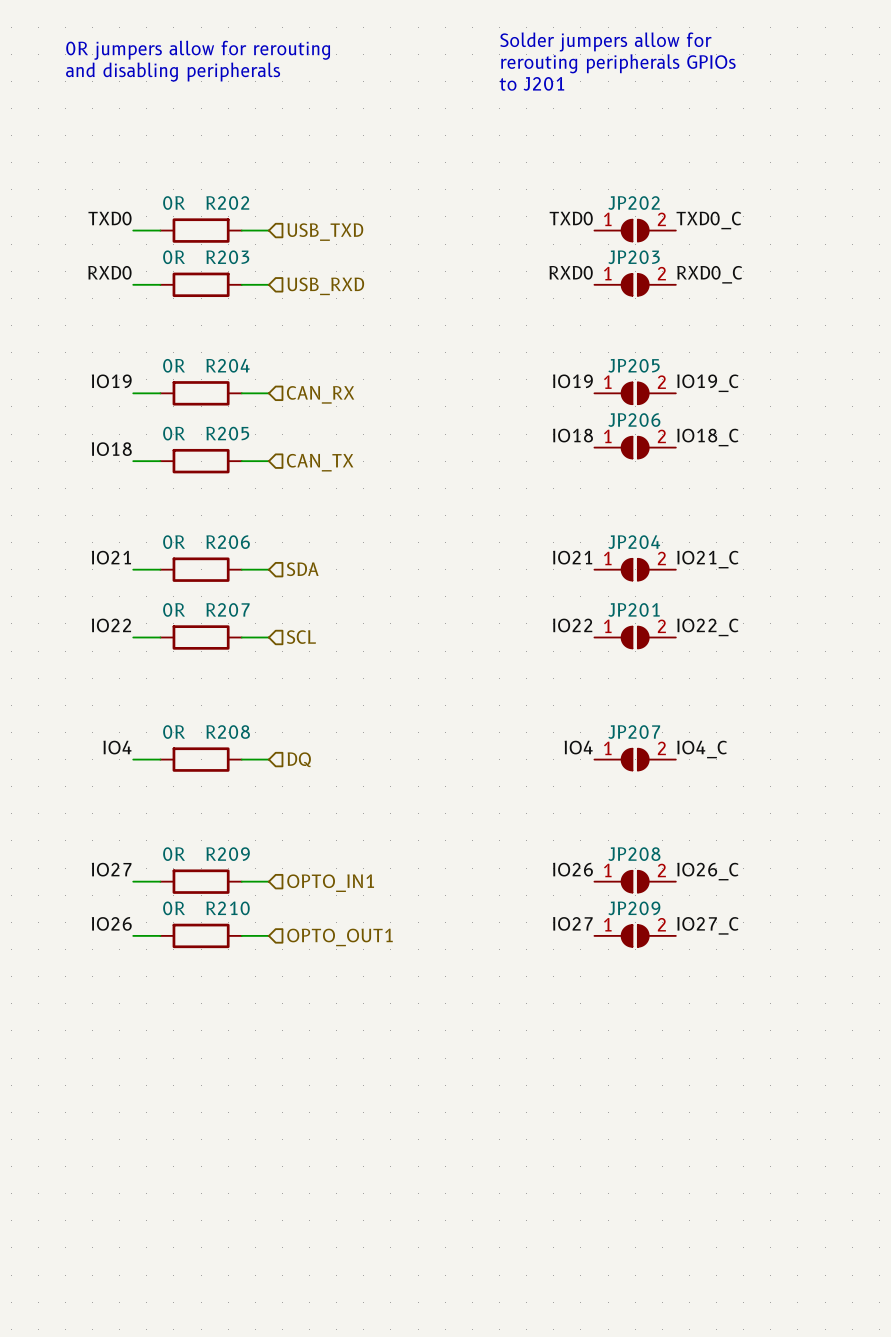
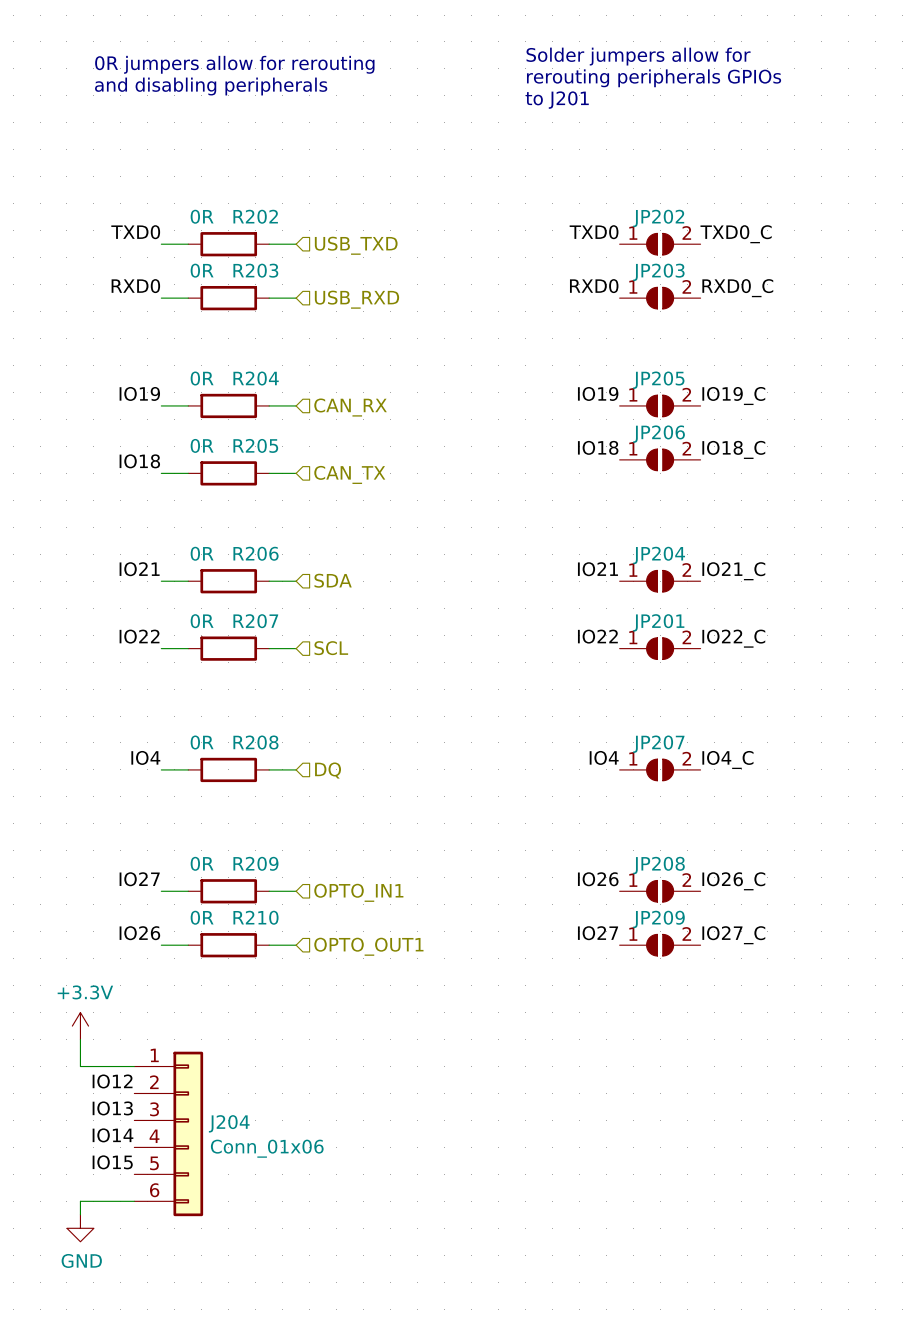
power symbol: none -> +3.3V (80, 1026)
wire: none -> (80, 1039) (80, 1066) (134, 1066)
label: none -> IO12 (112, 1081)
label: none -> IO13 (112, 1108)
J204: none -> Conn_01x06 (168, 1133)
label: none -> IO14 (112, 1135)
label: none -> IO15 (112, 1162)
wire: none -> (134, 1201) (80, 1201) (80, 1214)
power symbol: none -> GND (80, 1228)

